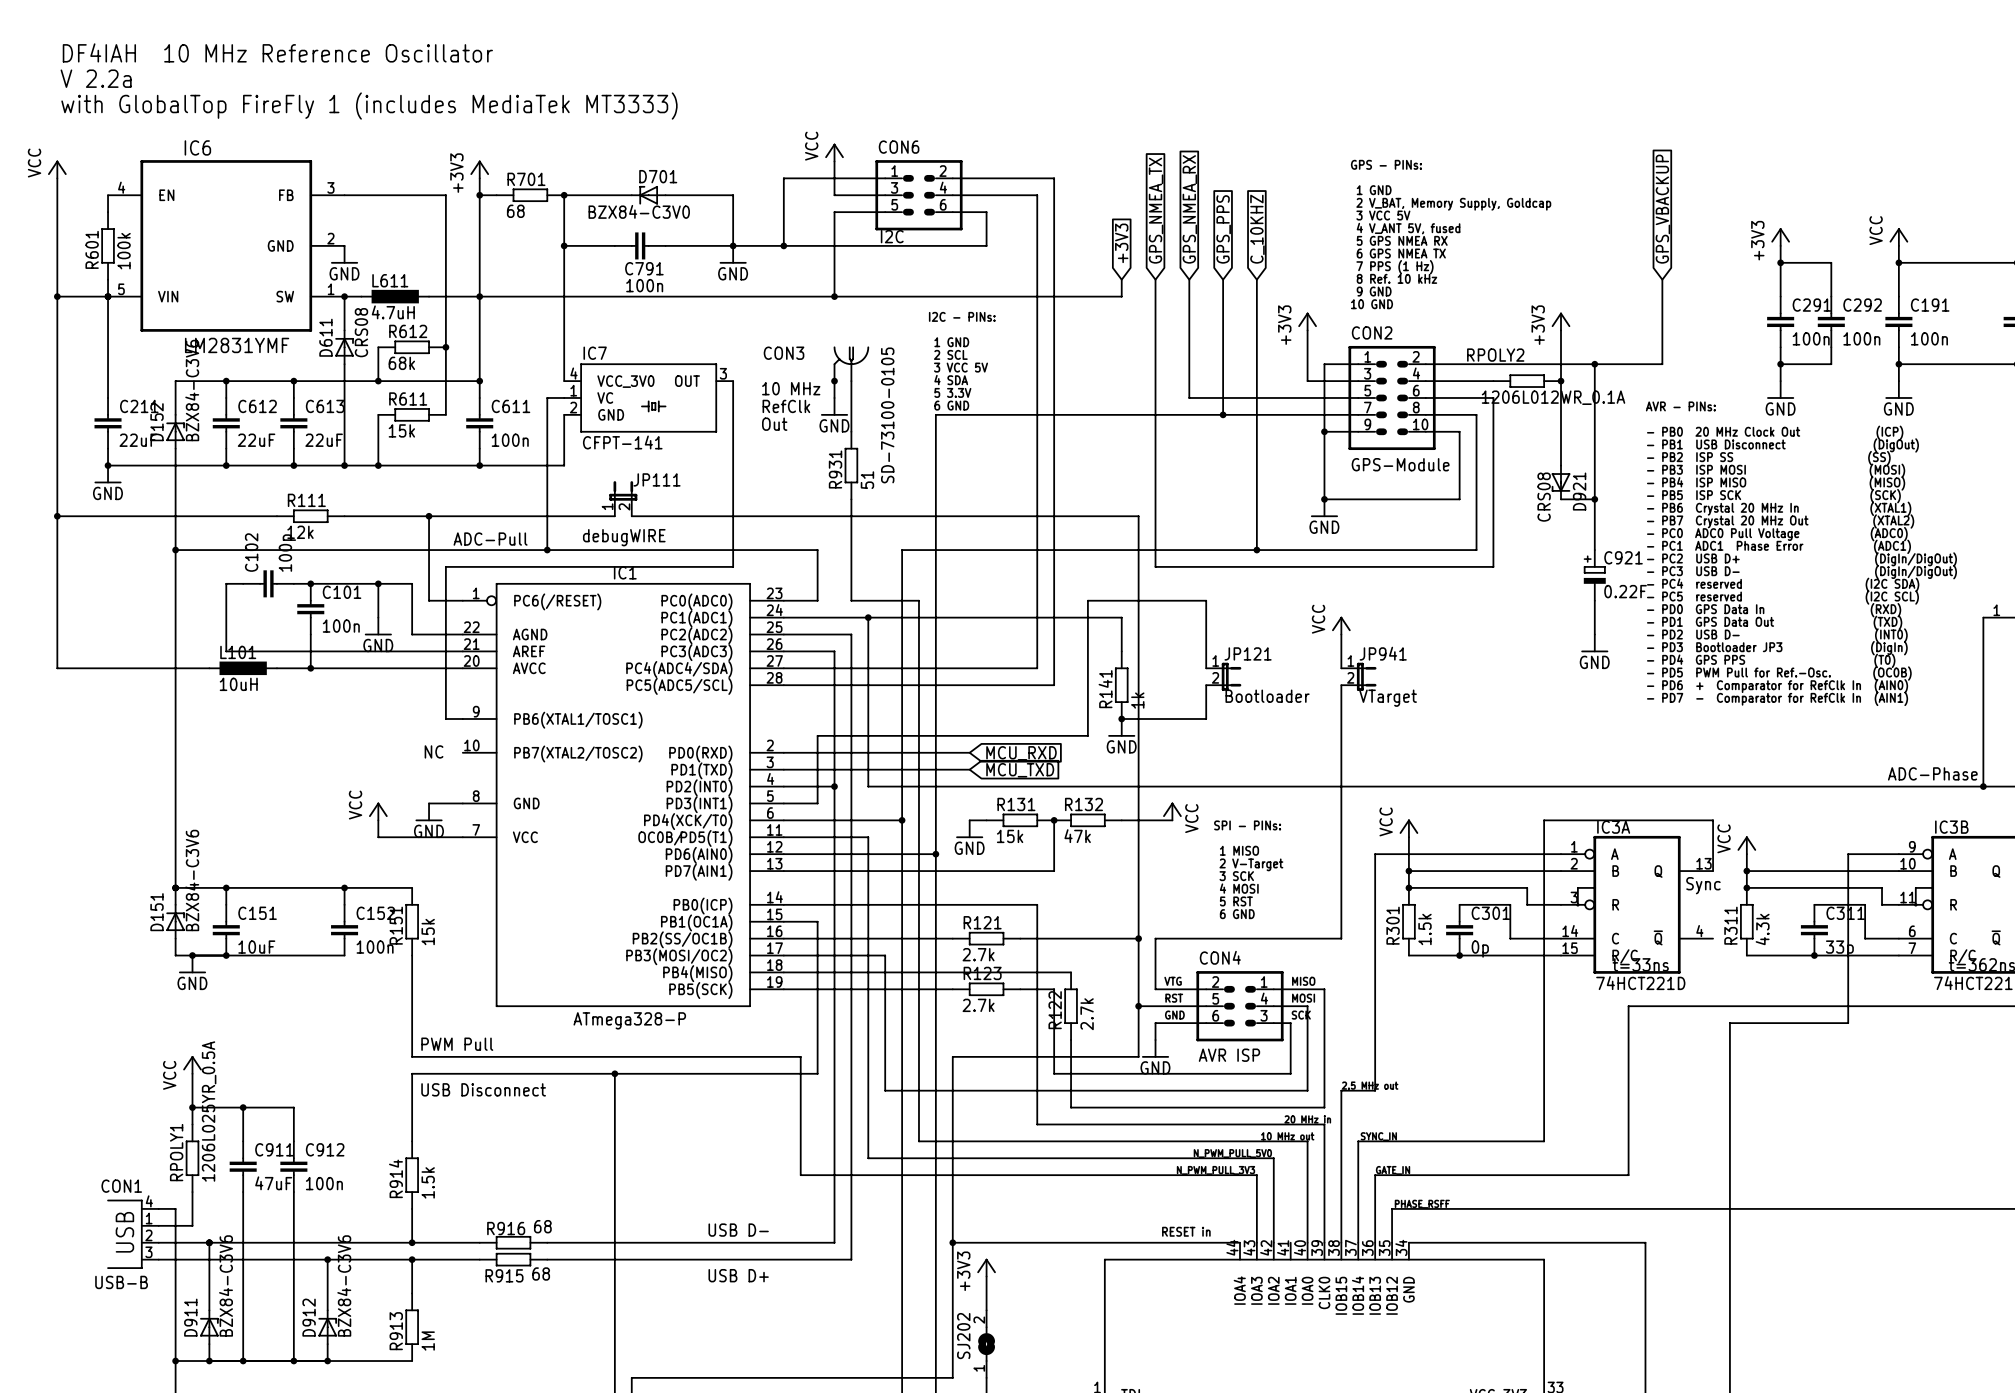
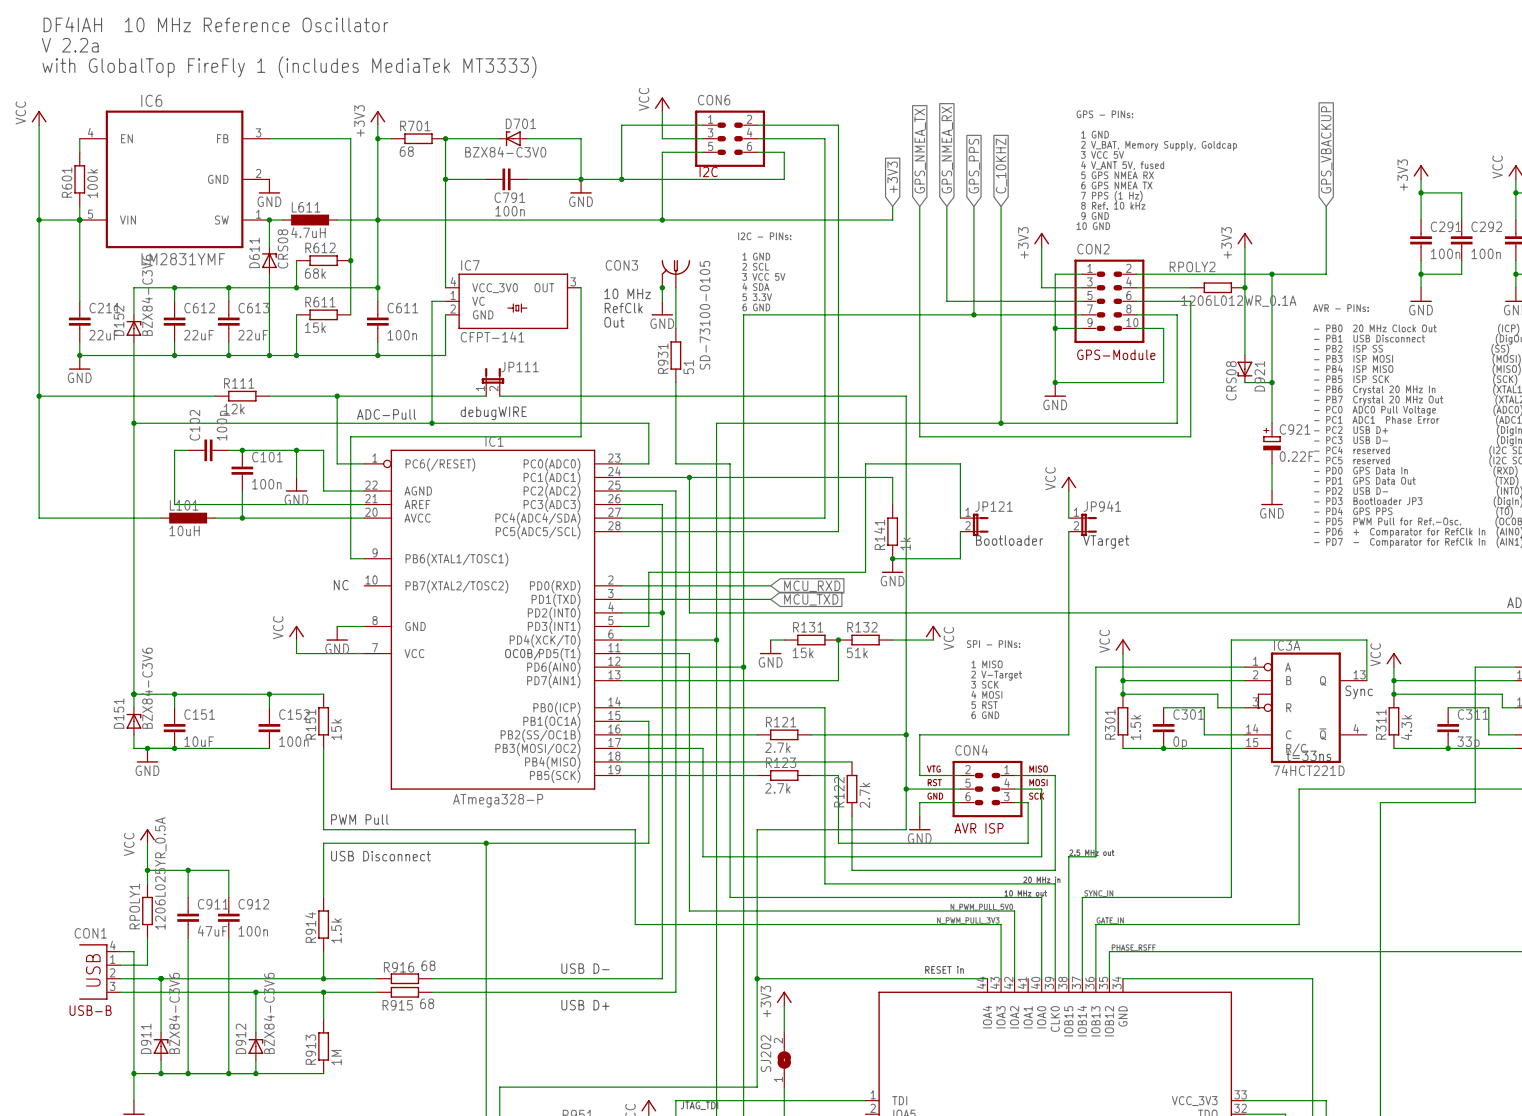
R132 value: 47k (1077, 836) -> 51k (857, 652)

